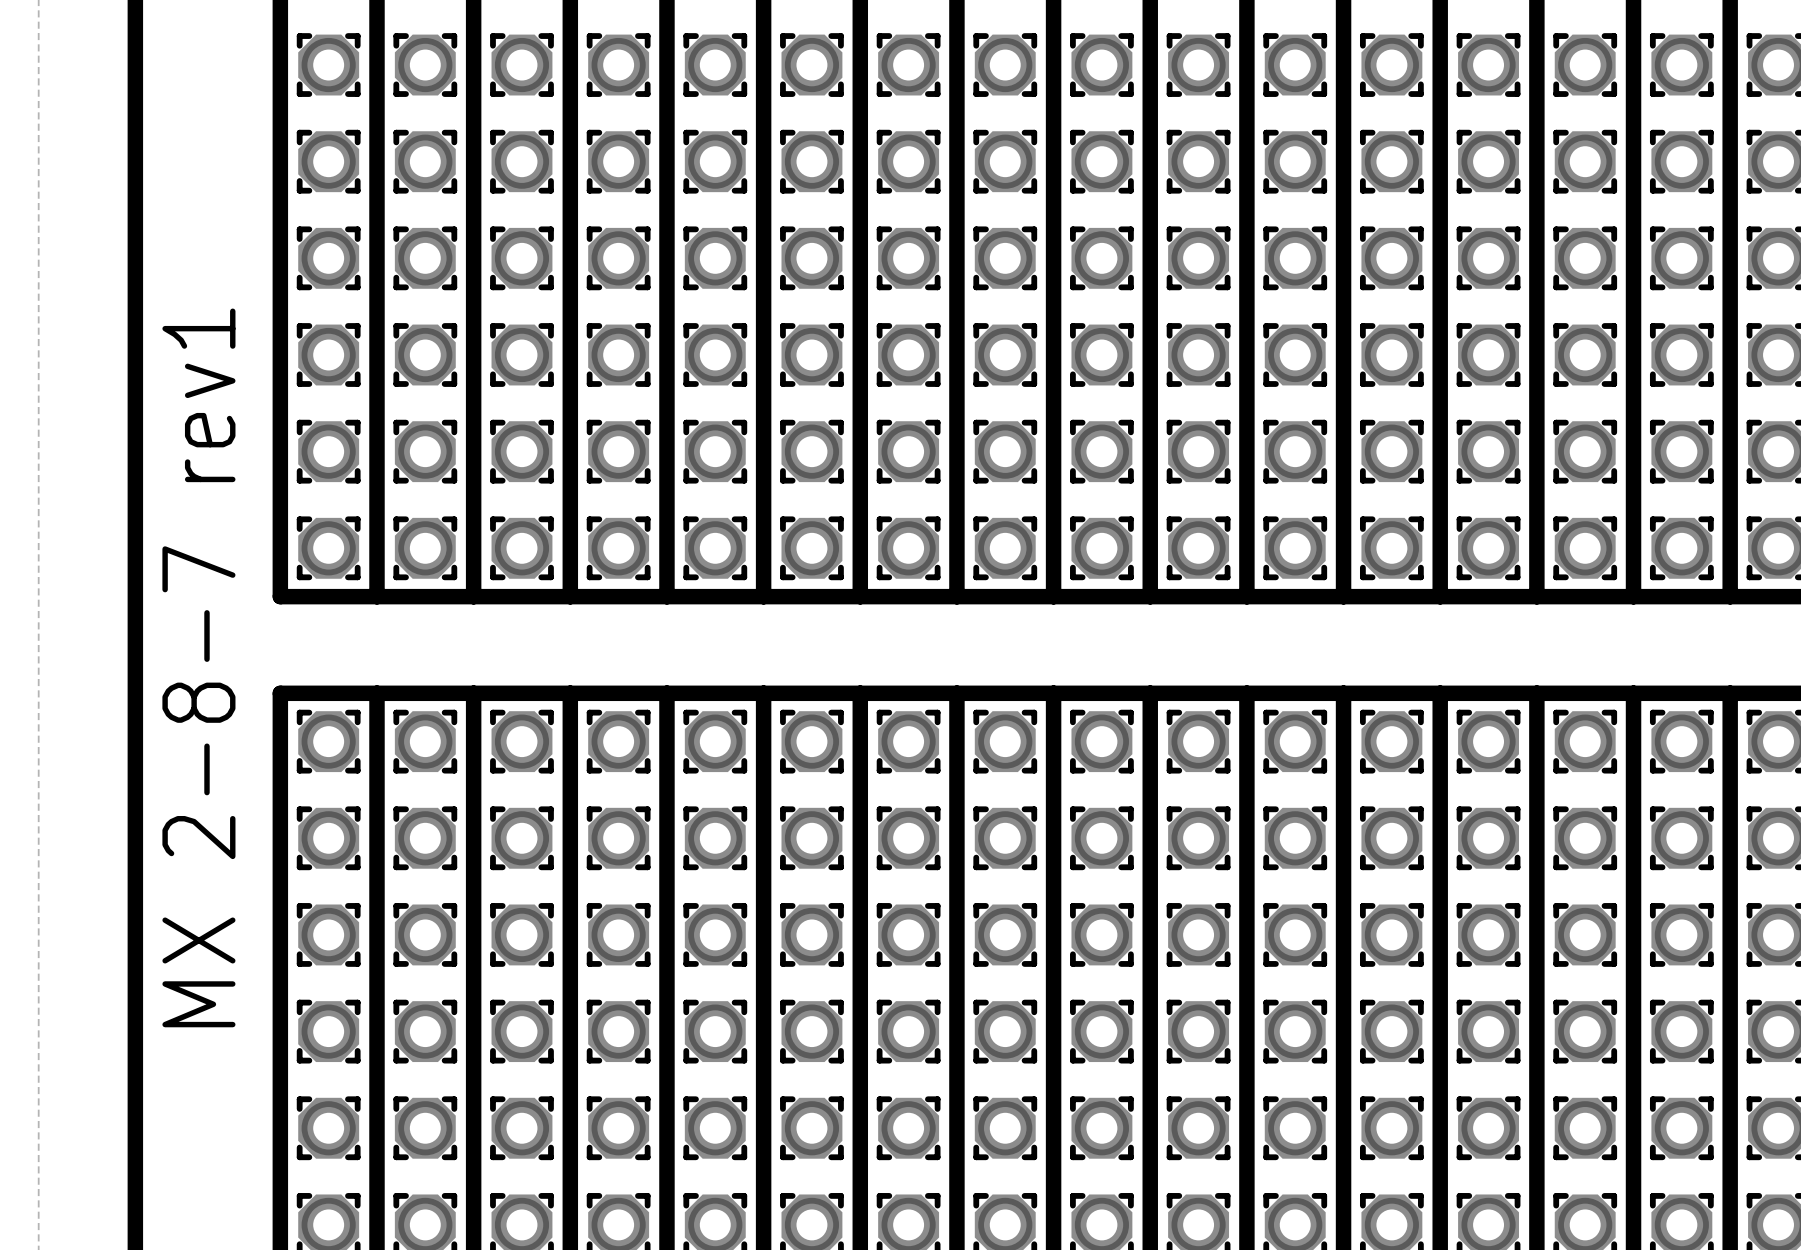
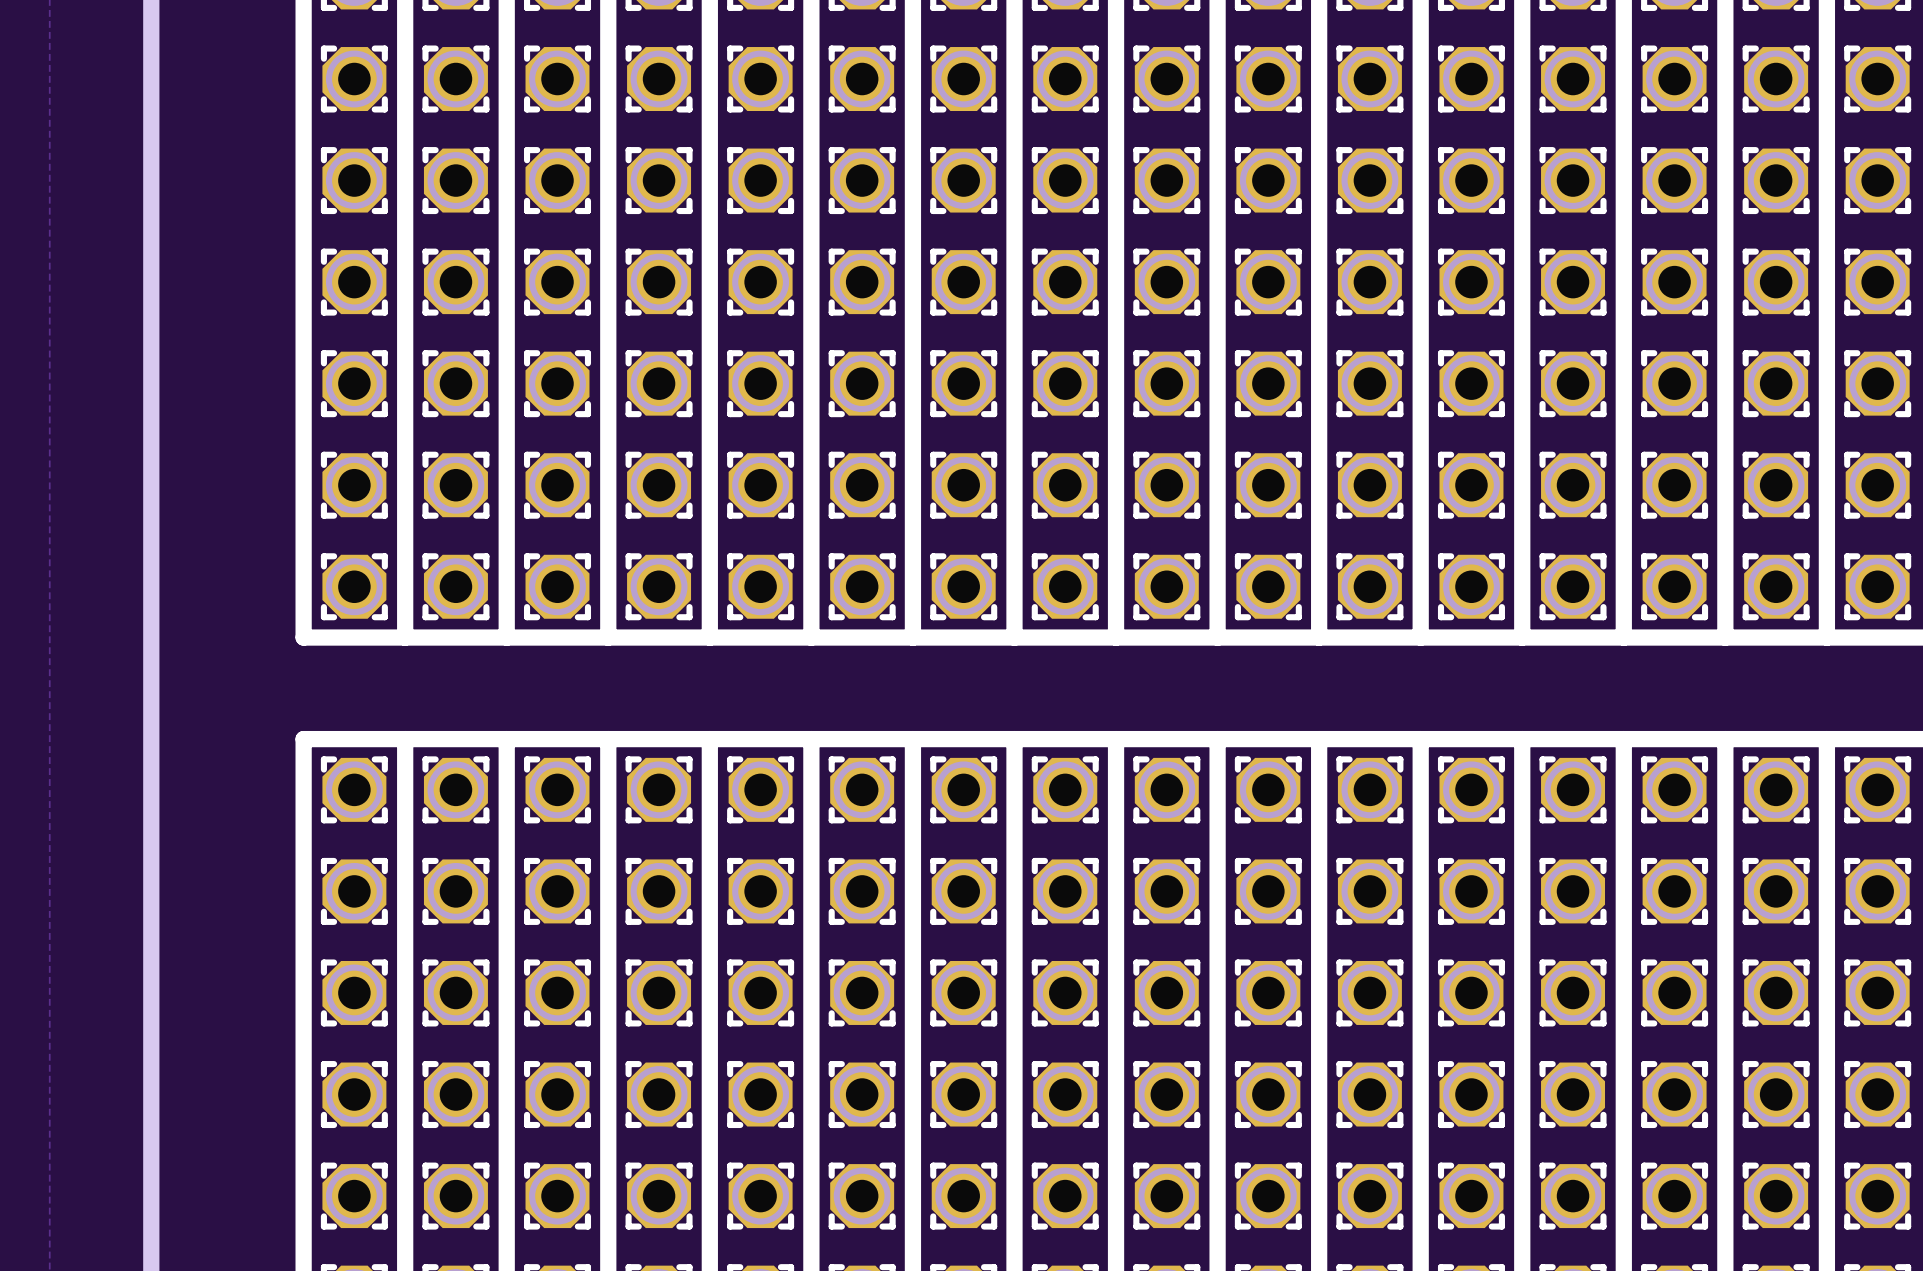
text: MX 2-8-7 rev1 (198, 667) -> none

